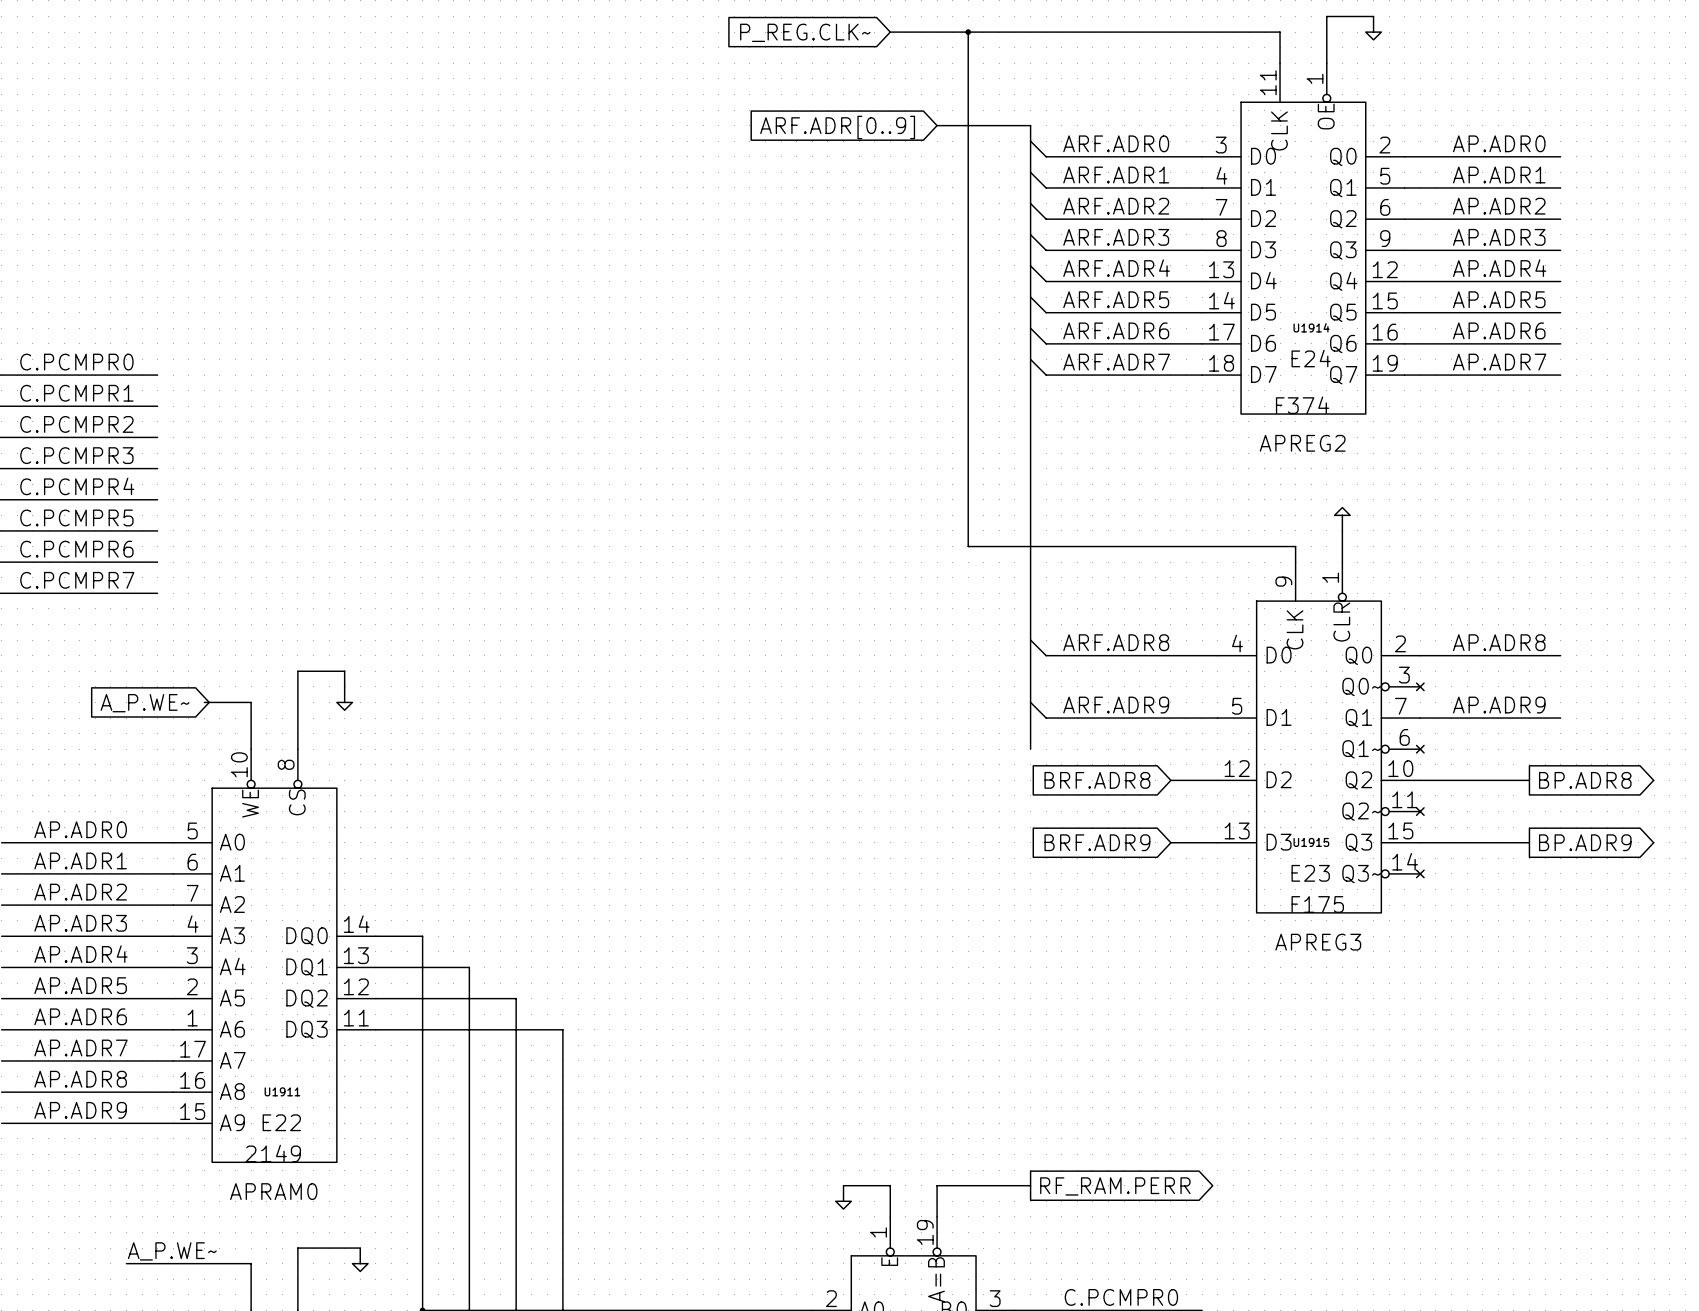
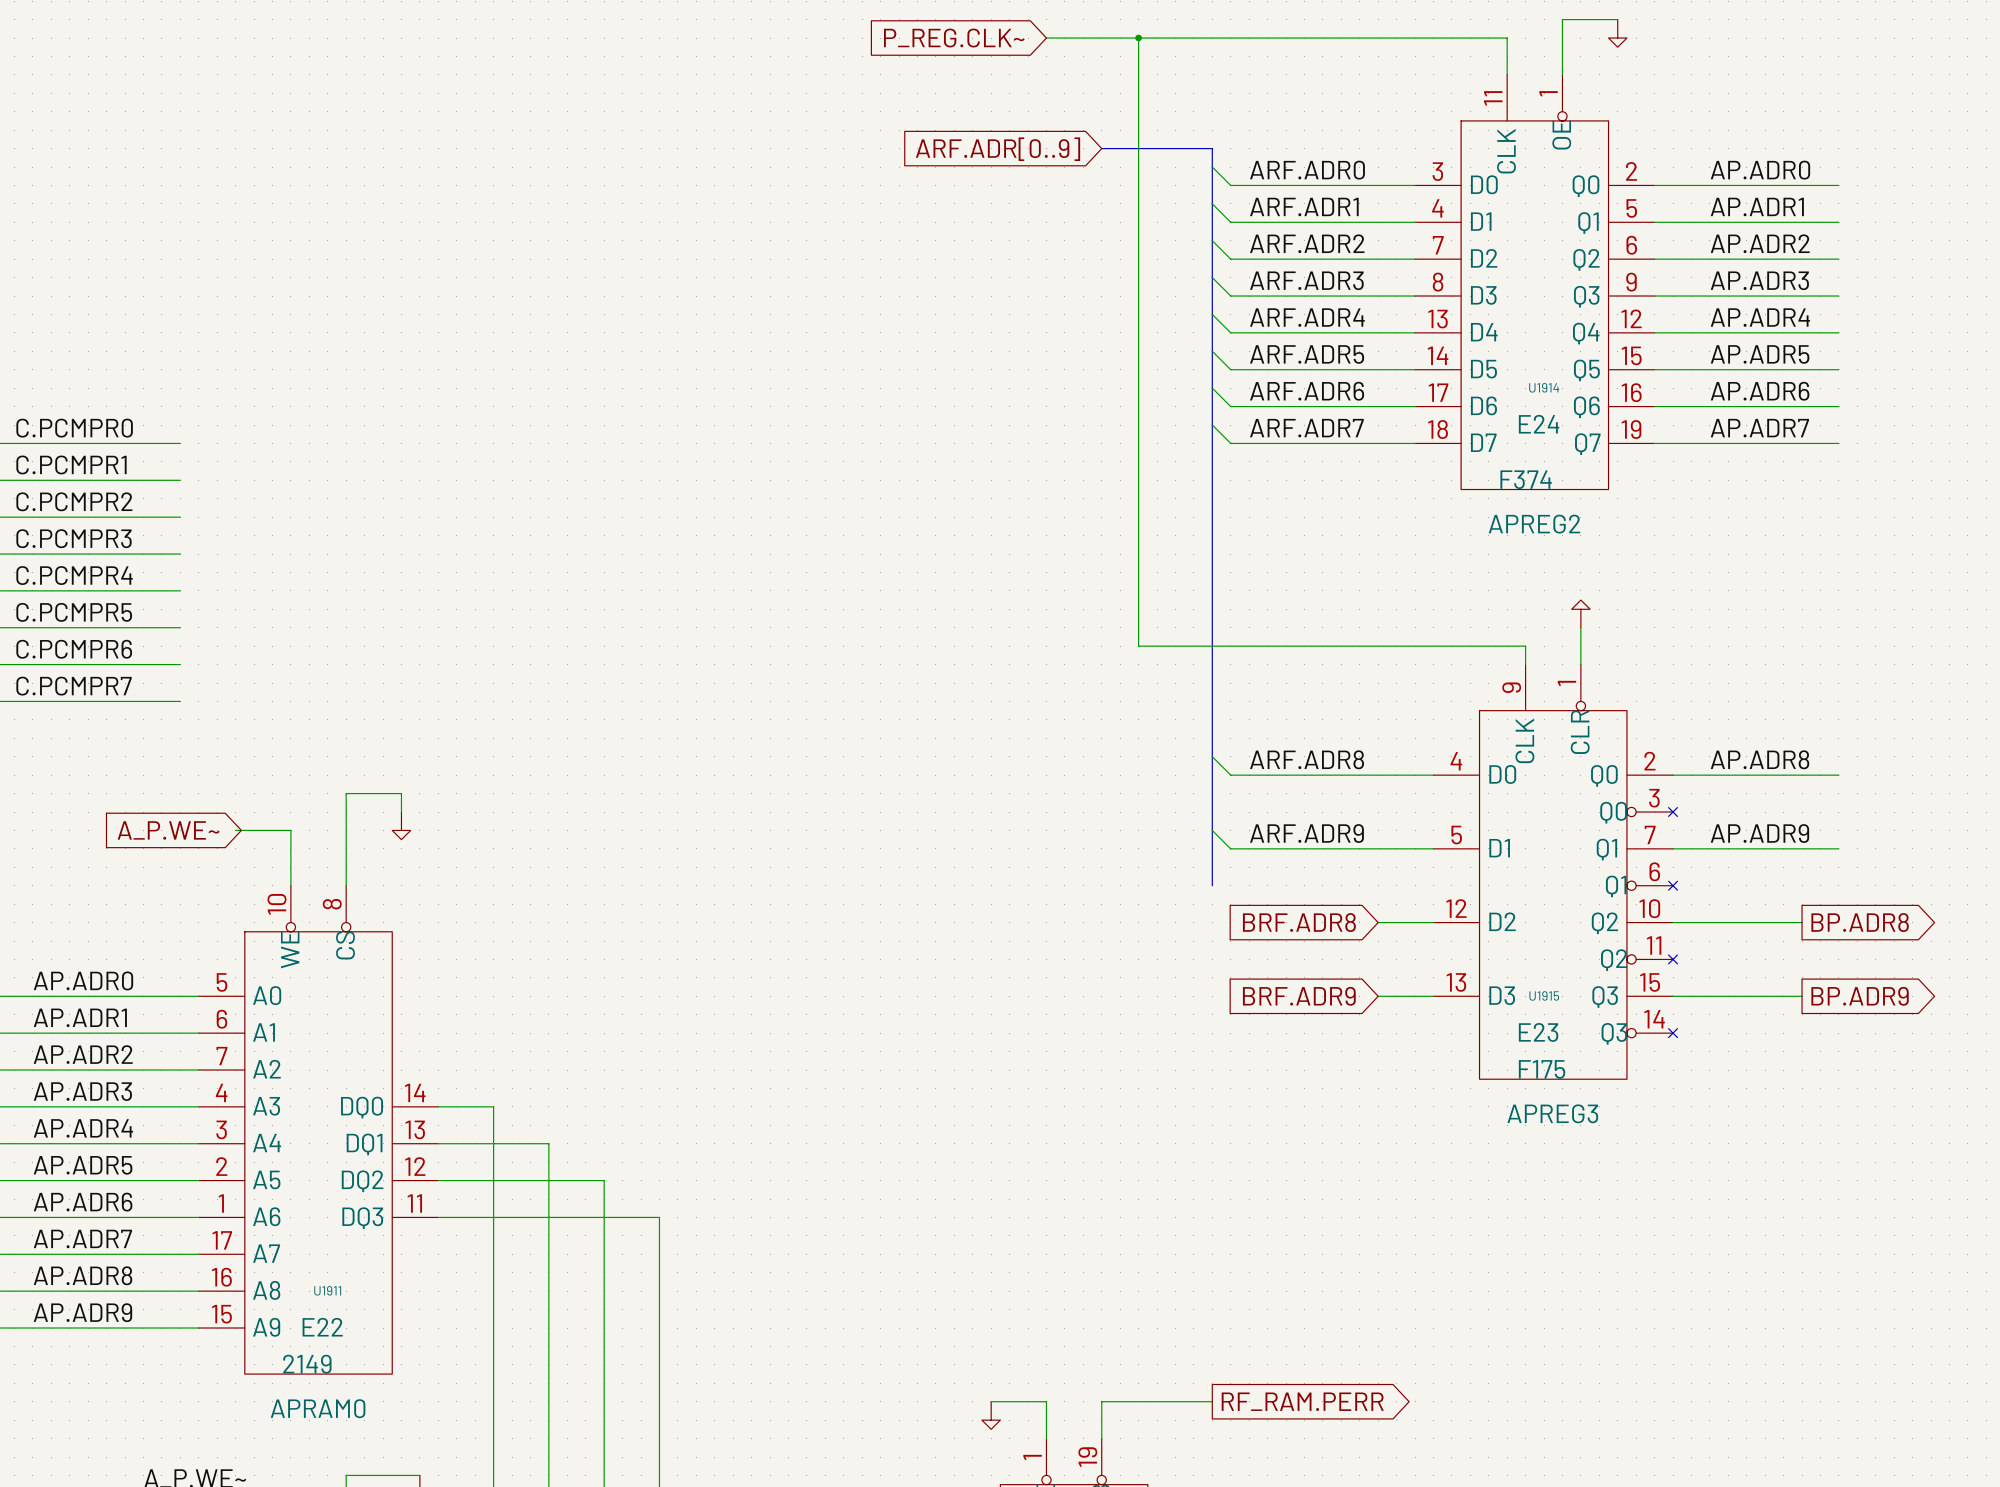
U1915 pin name: Q0~ (1361, 687) -> Q0 (1613, 812)
U1915 pin name: Q1~ (1361, 749) -> Q1 (1616, 886)
U1915 pin name: Q2~ (1361, 811) -> Q2 (1614, 960)
U1915 pin name: Q3~ (1361, 874) -> Q3 (1614, 1033)

